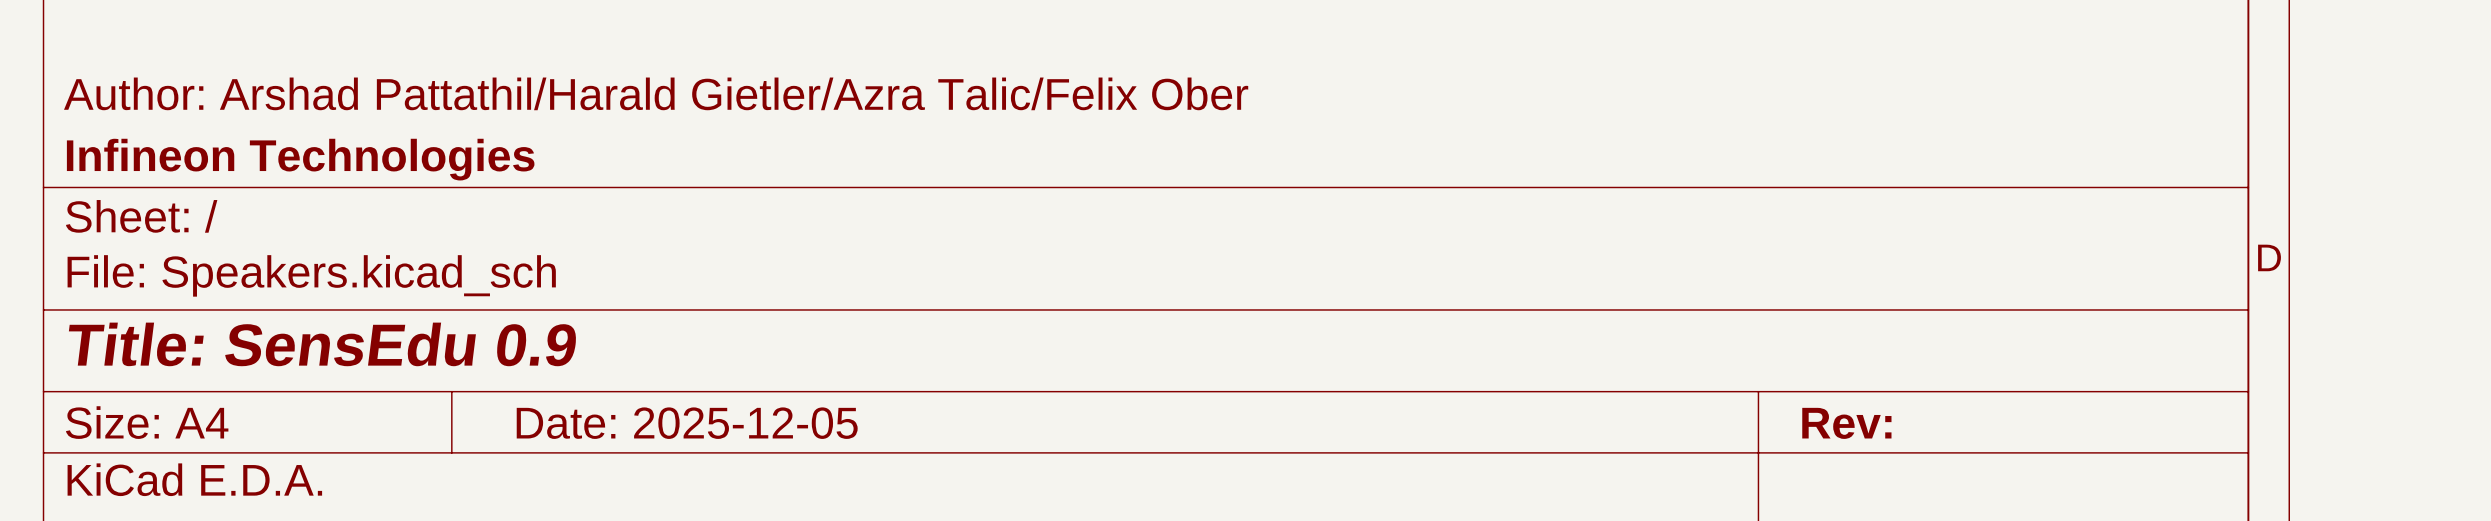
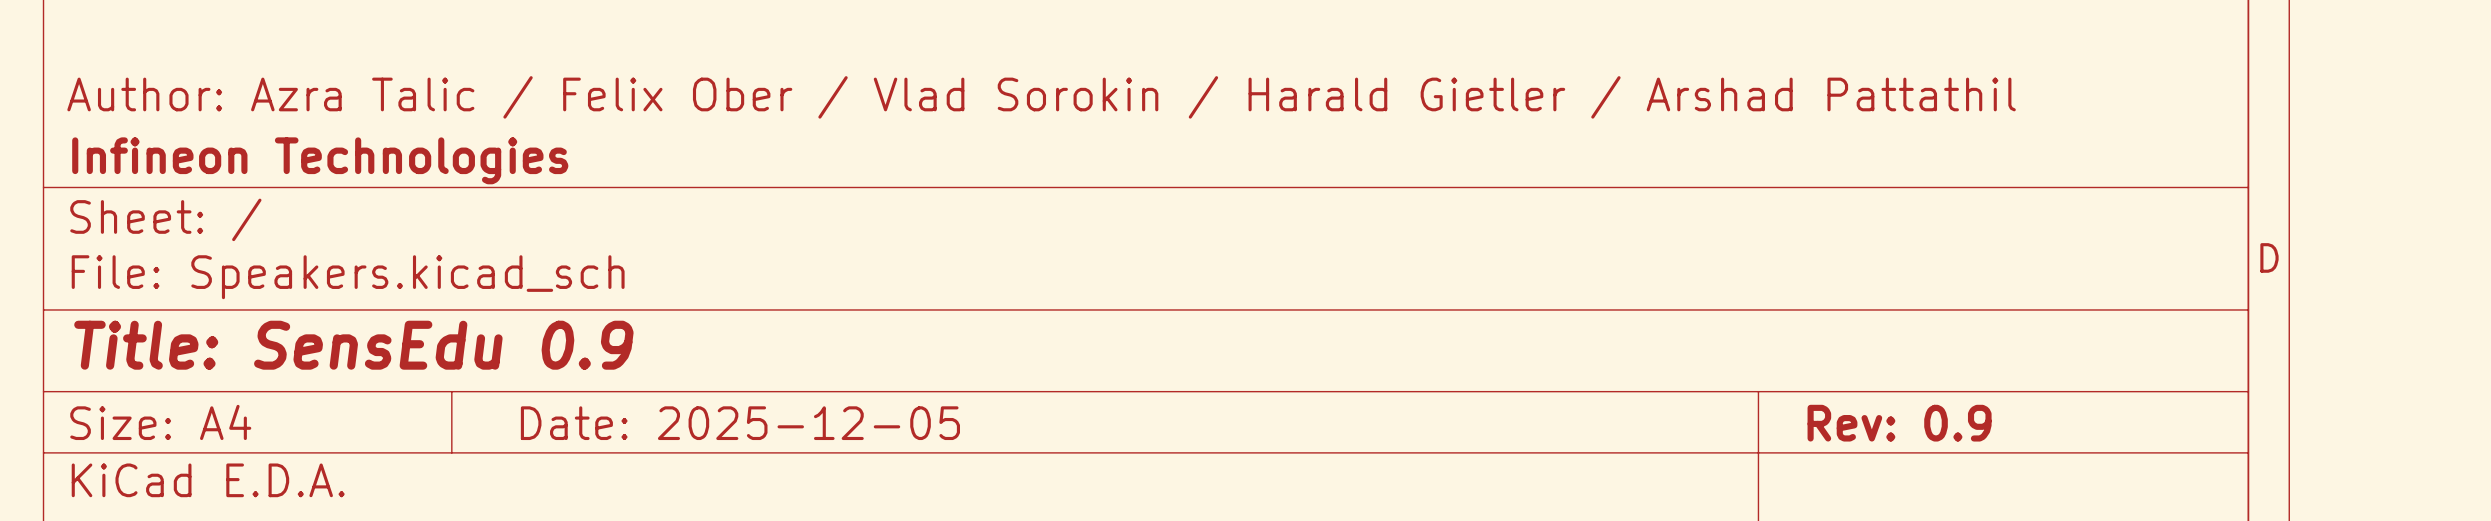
title block: Author: Arshad Pattathil/Harald Gietler/Azra Talic/Felix Ober (656, 93) -> Author: Azra Talic / Felix Ober / Vlad Sorokin / Harald Gietler / Arshad Pattathil (1041, 97)
title block: Rev: (1846, 423) -> Rev: 0.9 (1899, 423)

